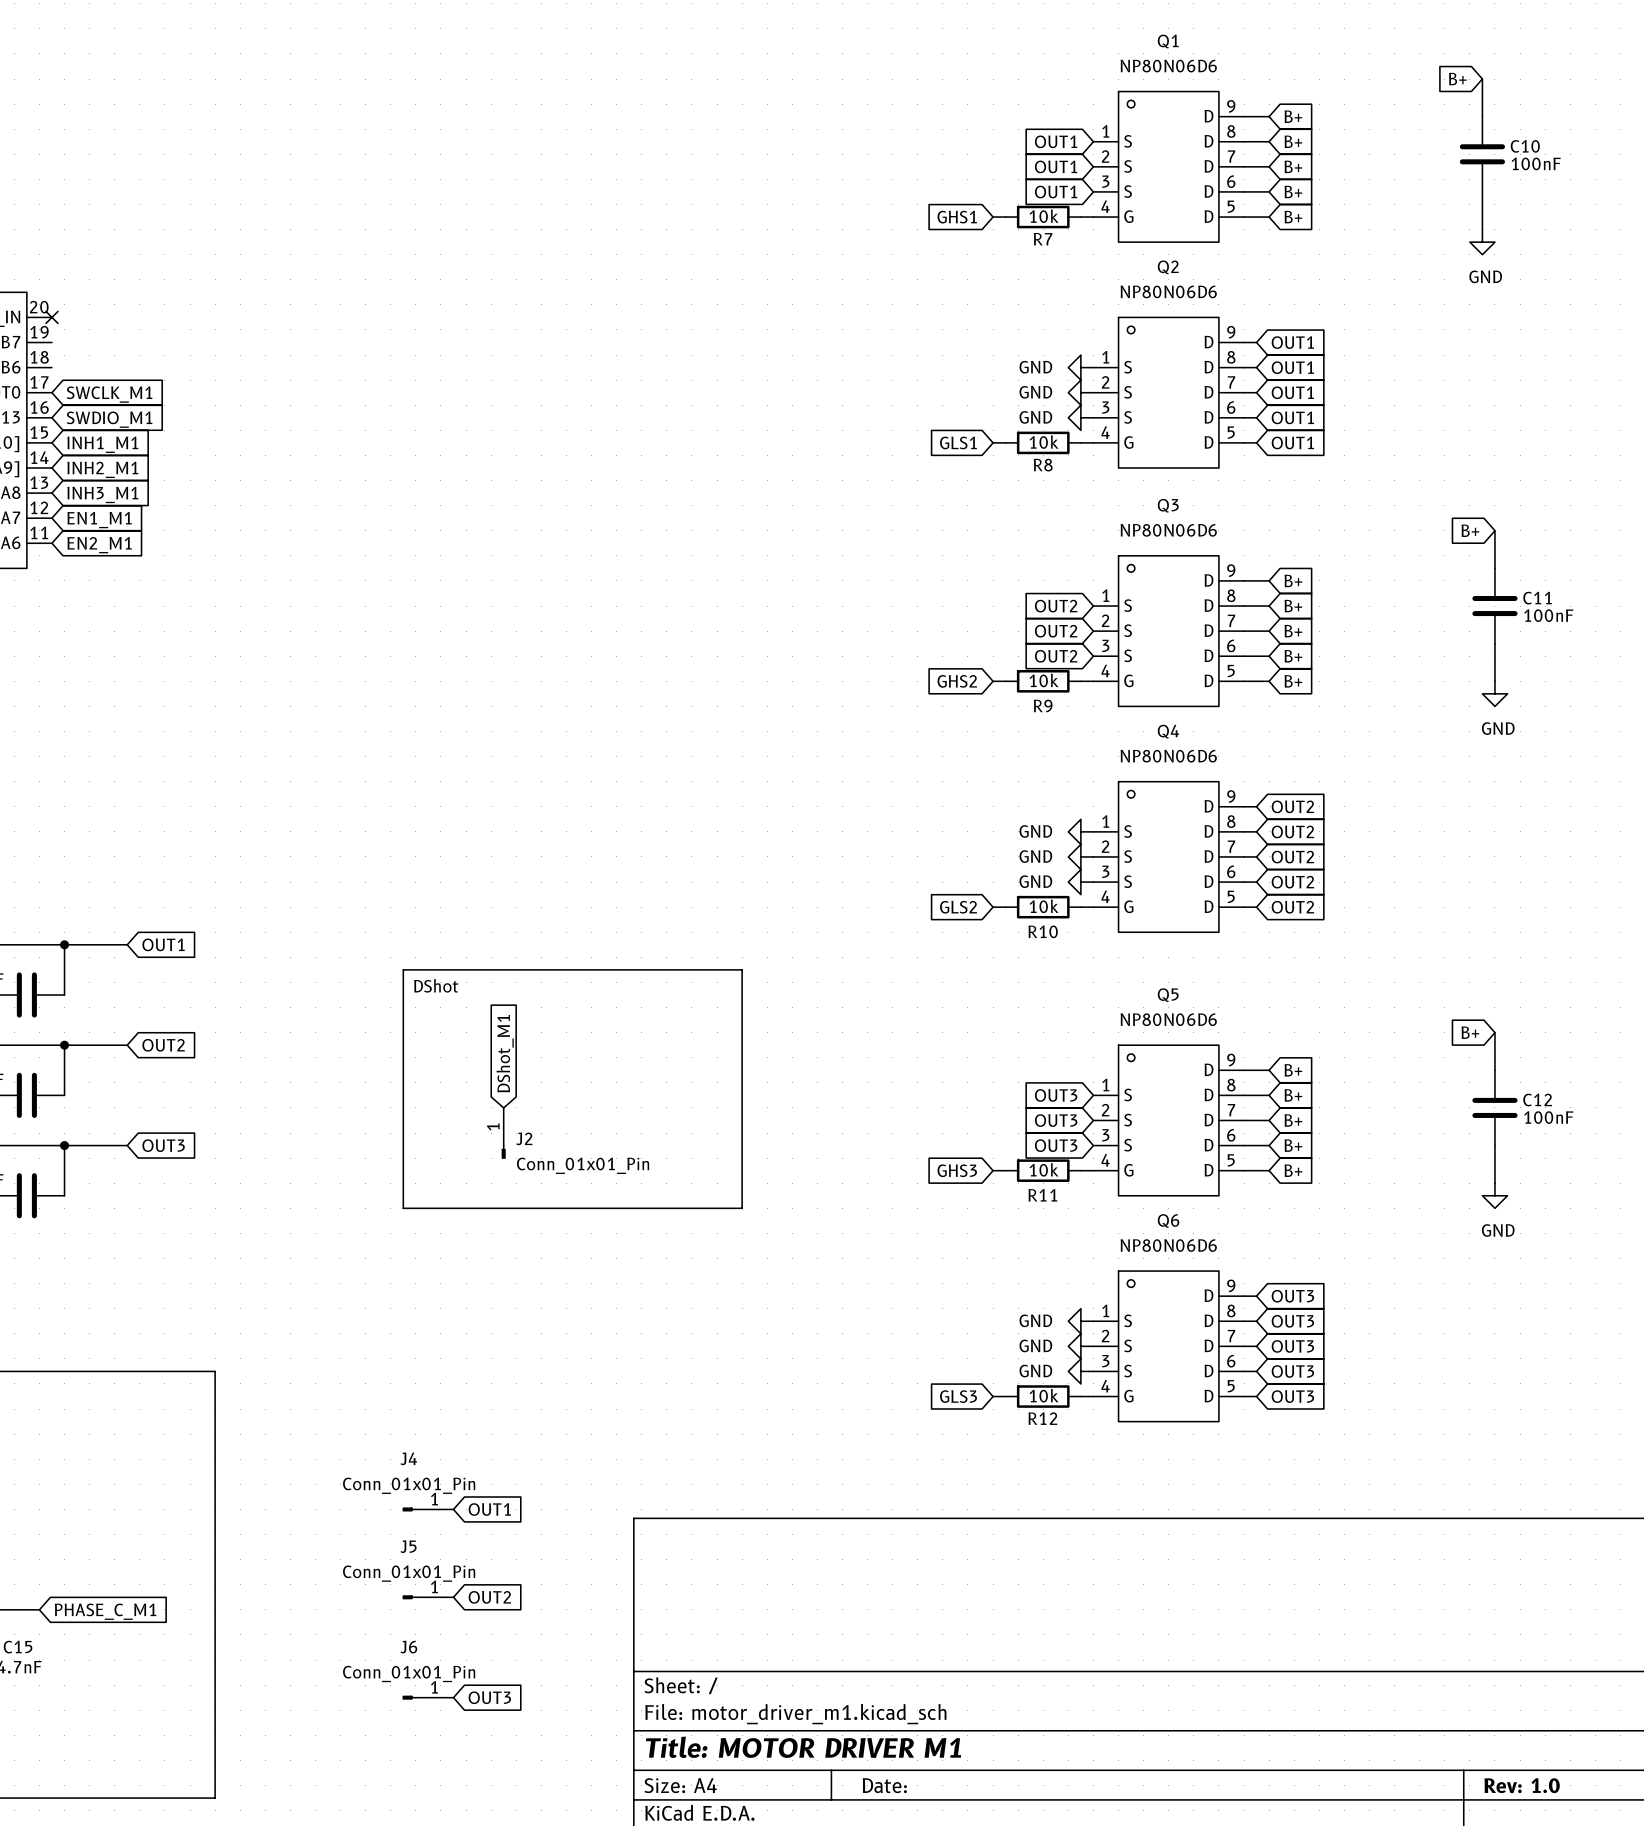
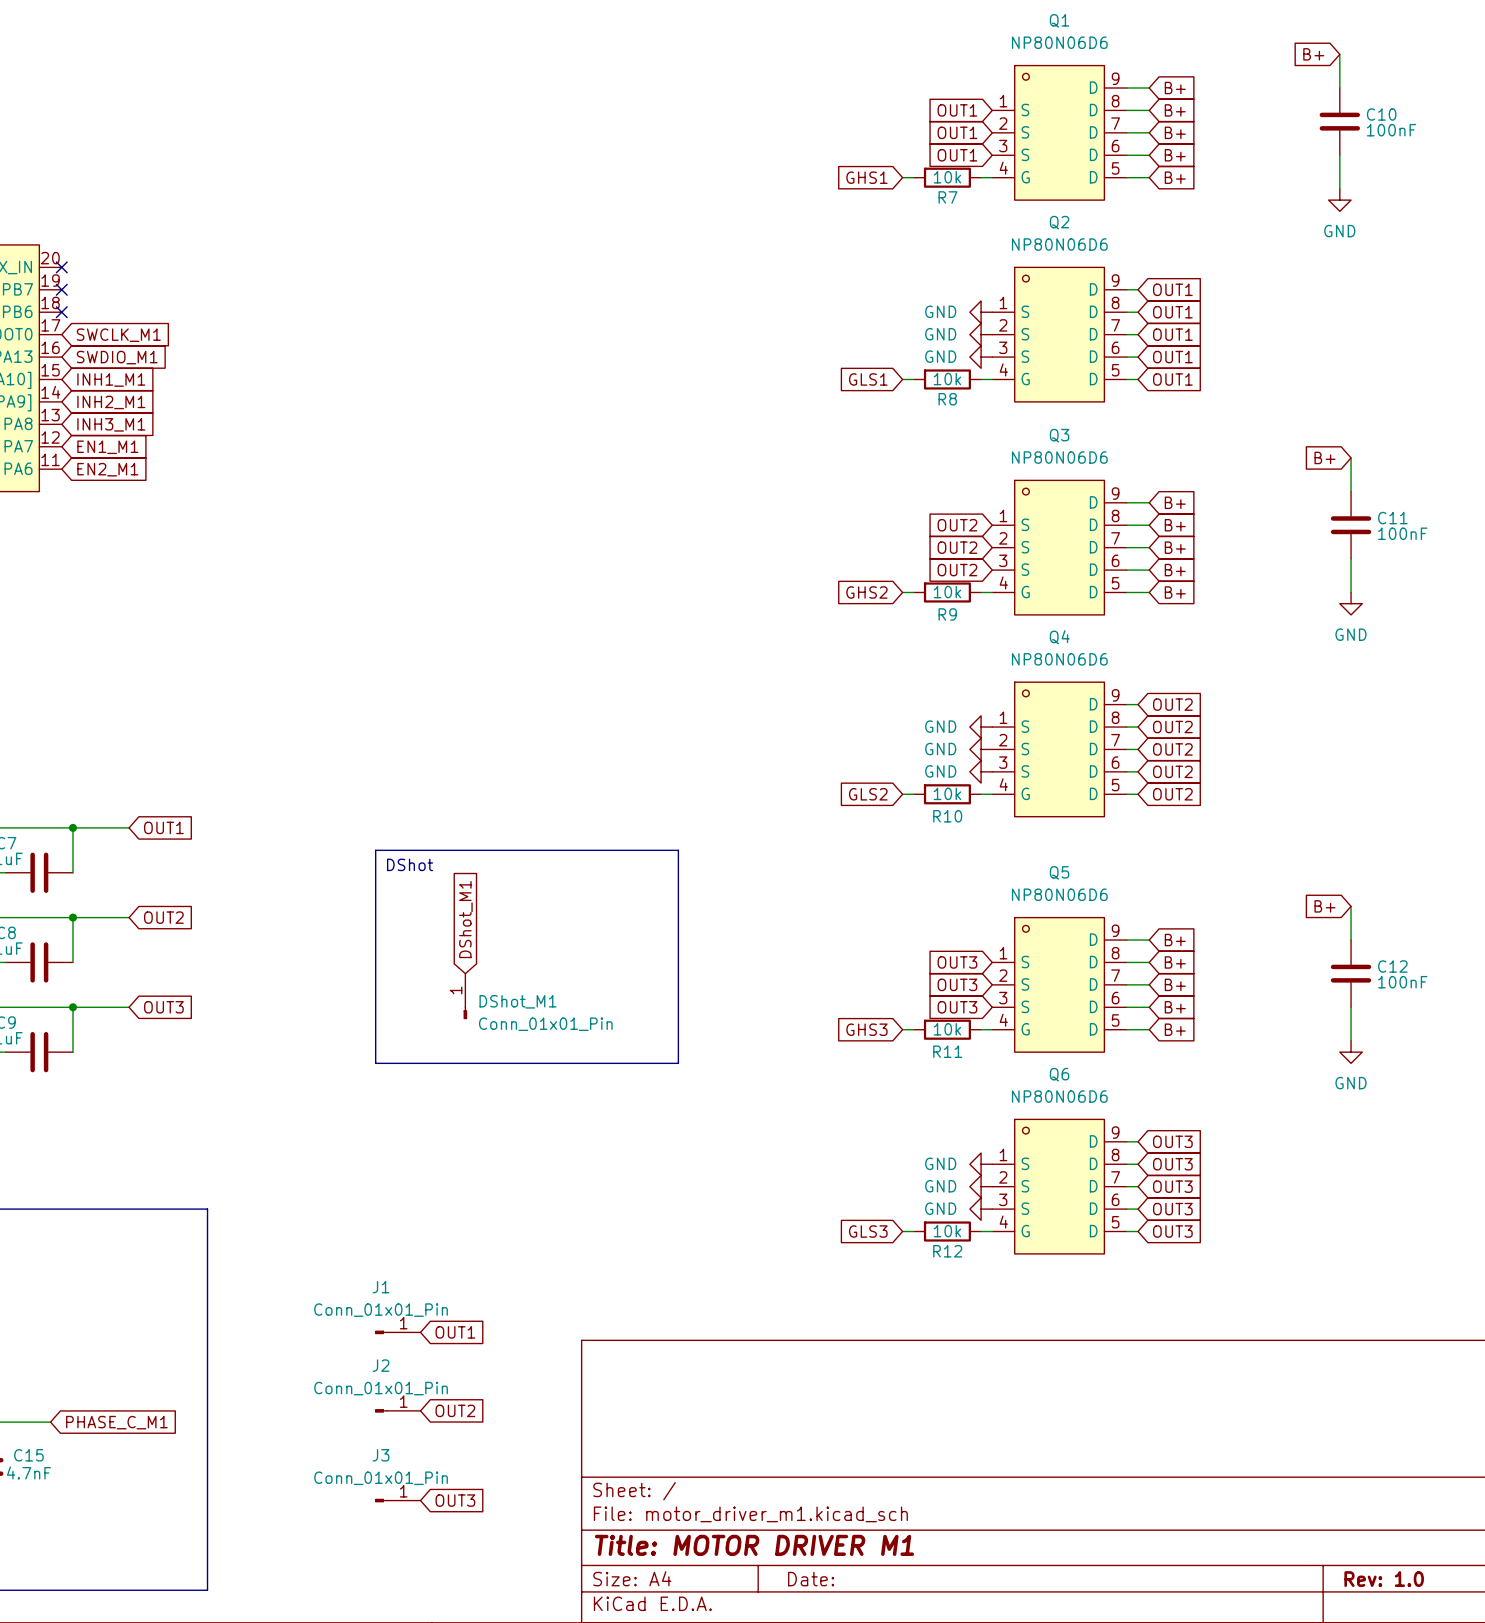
no-connect mark: none -> (61, 289)
no-connect mark: none -> (61, 312)
J2 name: J2 (524, 1138) -> DShot_M1 (518, 1001)
J4 name: J4 (408, 1458) -> J1 (381, 1287)
J5 name: J5 (408, 1546) -> J2 (381, 1365)
J6 name: J6 (408, 1647) -> J3 (381, 1455)

